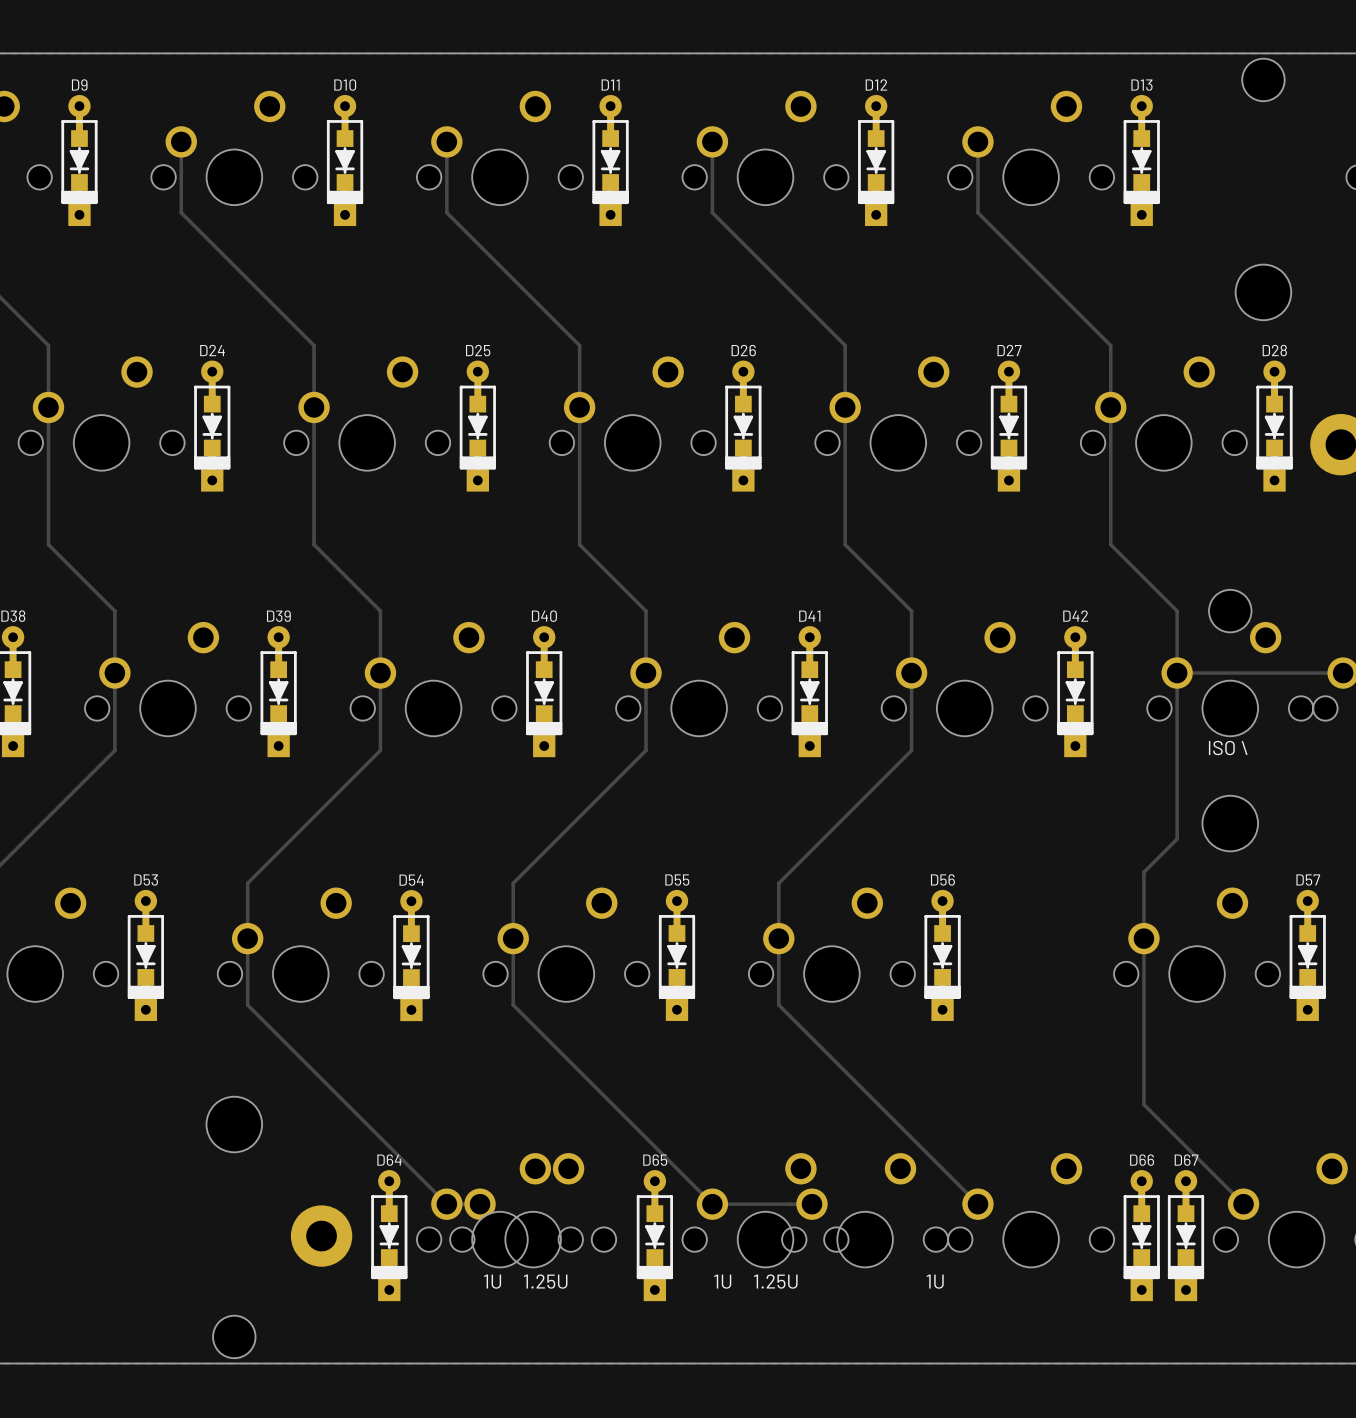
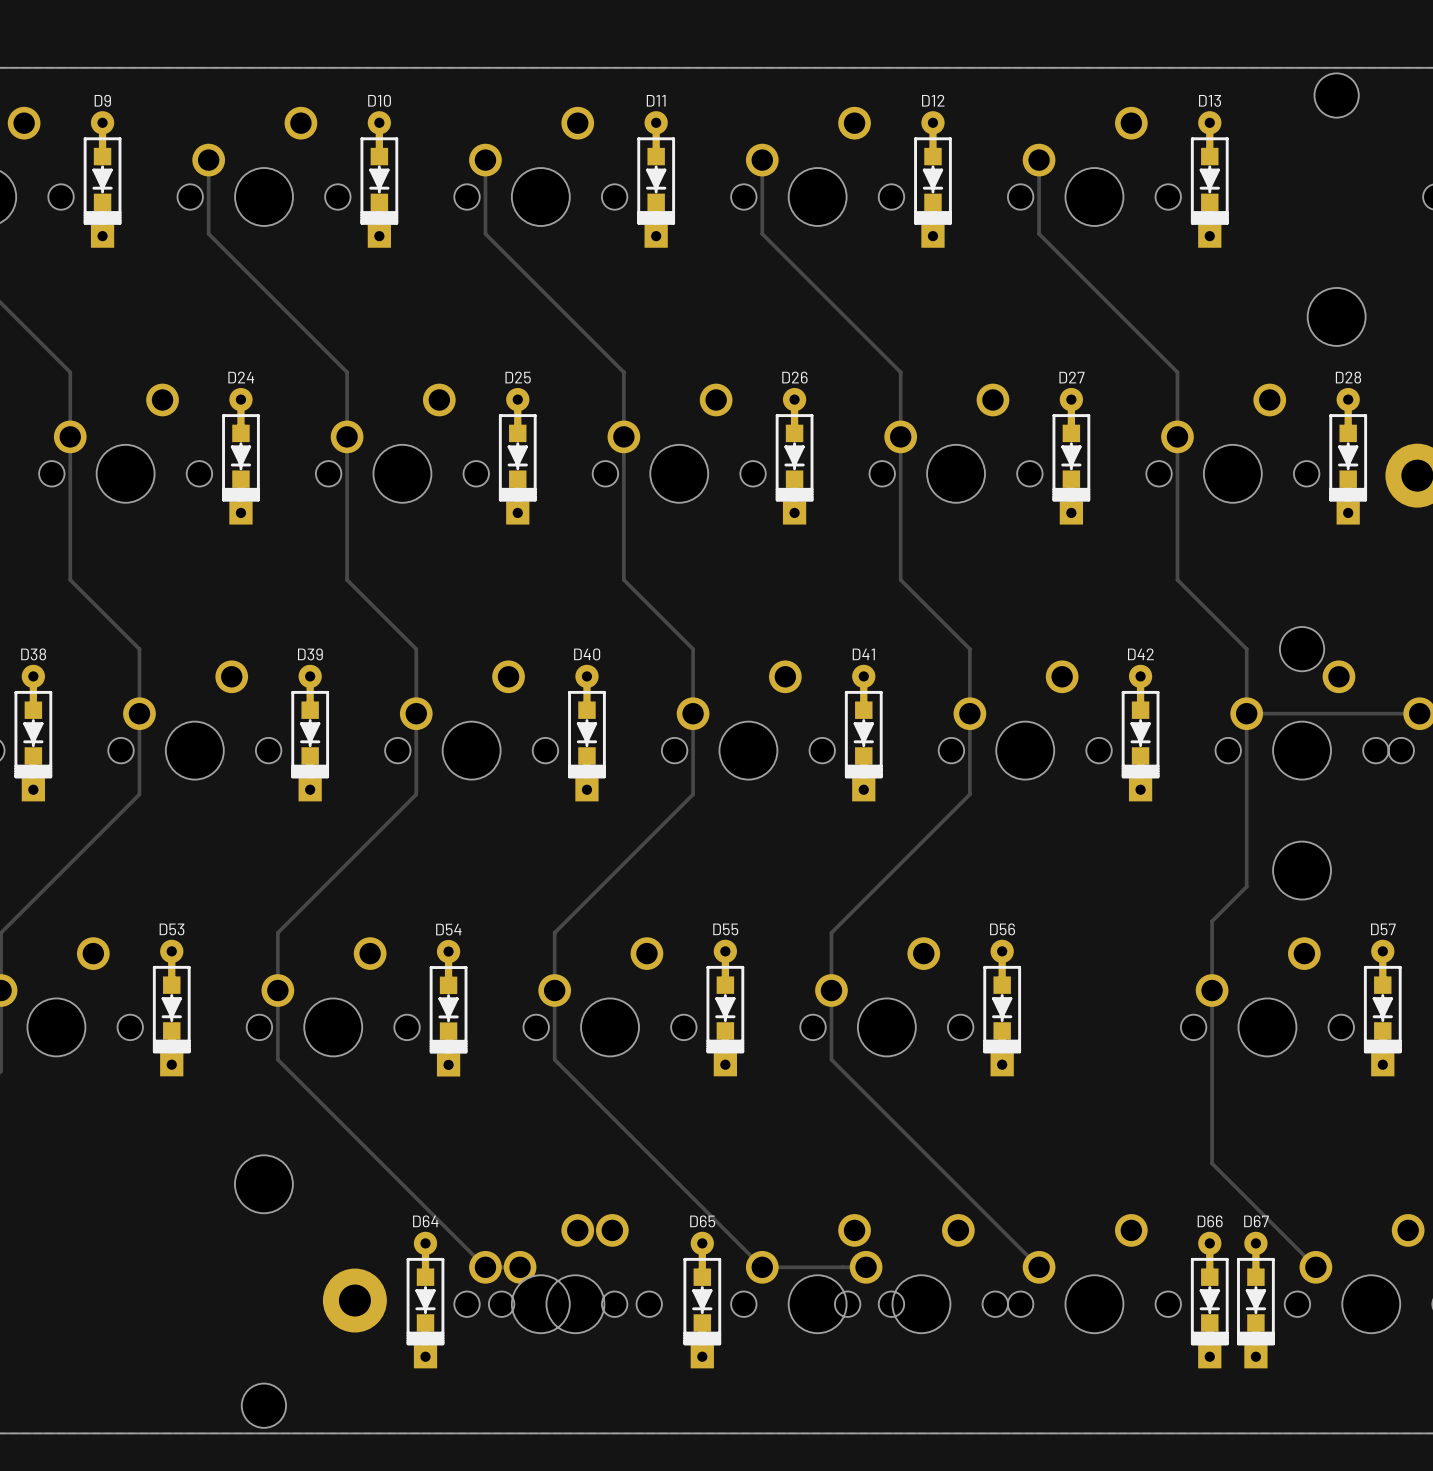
text: ISO \ (1228, 748) -> none
text: 1U (492, 1281) -> none
text: 1.25U (545, 1281) -> none
text: 1U (722, 1281) -> none
text: 1.25U (775, 1281) -> none
text: 1U (935, 1281) -> none

